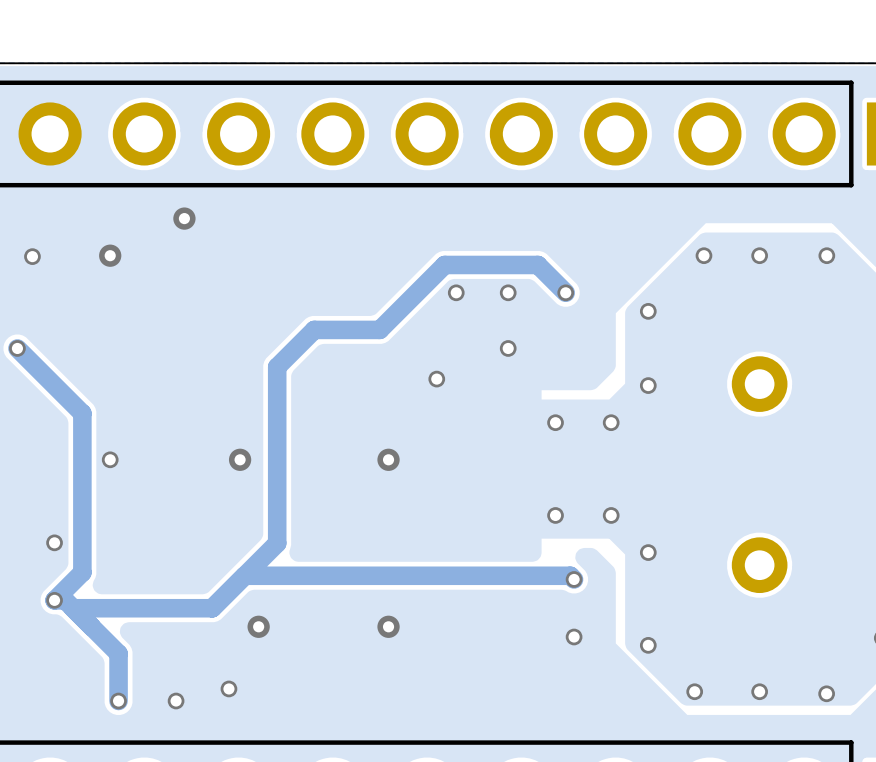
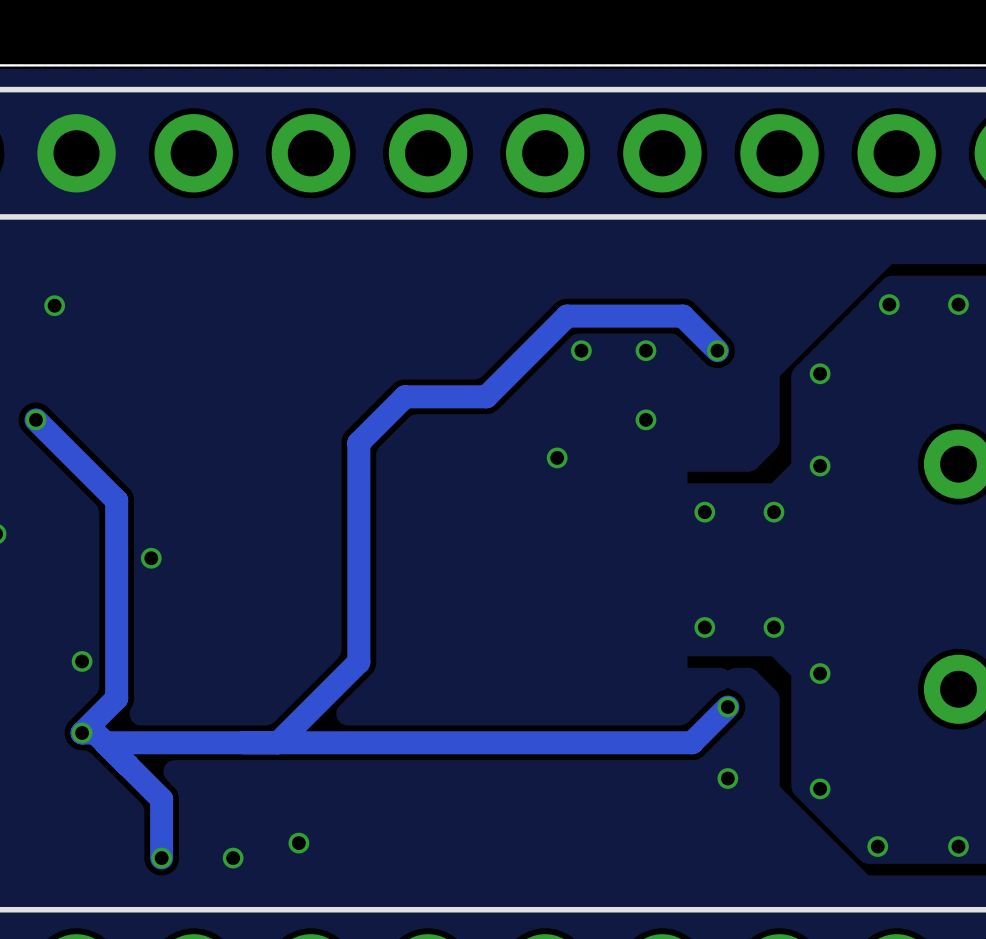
via: (184, 218) -> none
via: (110, 255) -> none
via: (240, 459) -> none
via: (388, 459) -> none
track: (244, 575) (570, 575) (574, 579) -> (278, 742) (692, 742) (727, 707)
via: (258, 626) -> none
via: (388, 626) -> none

